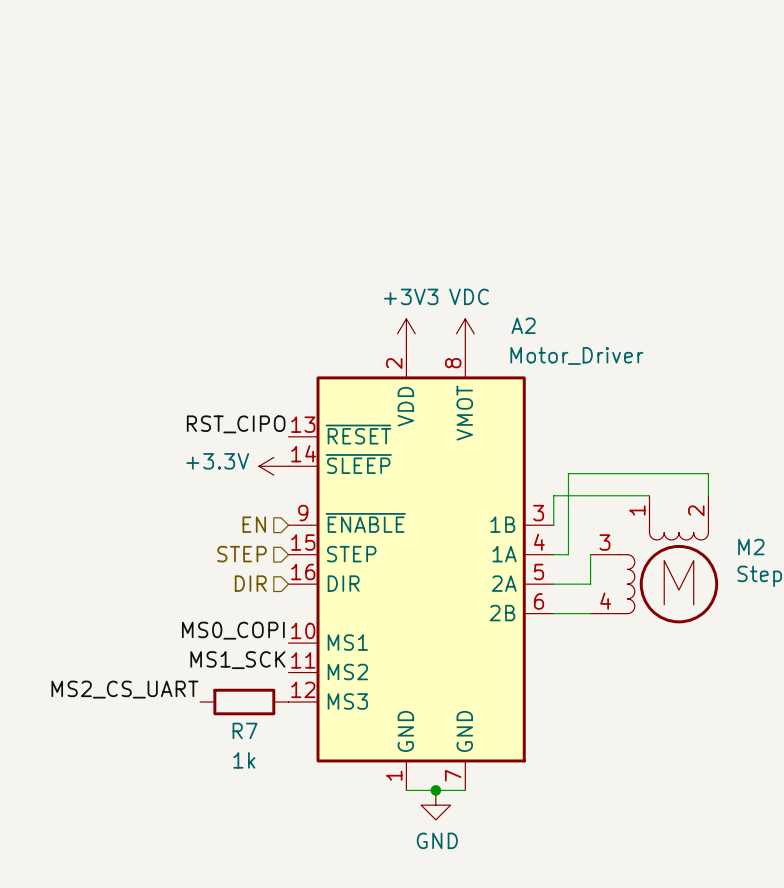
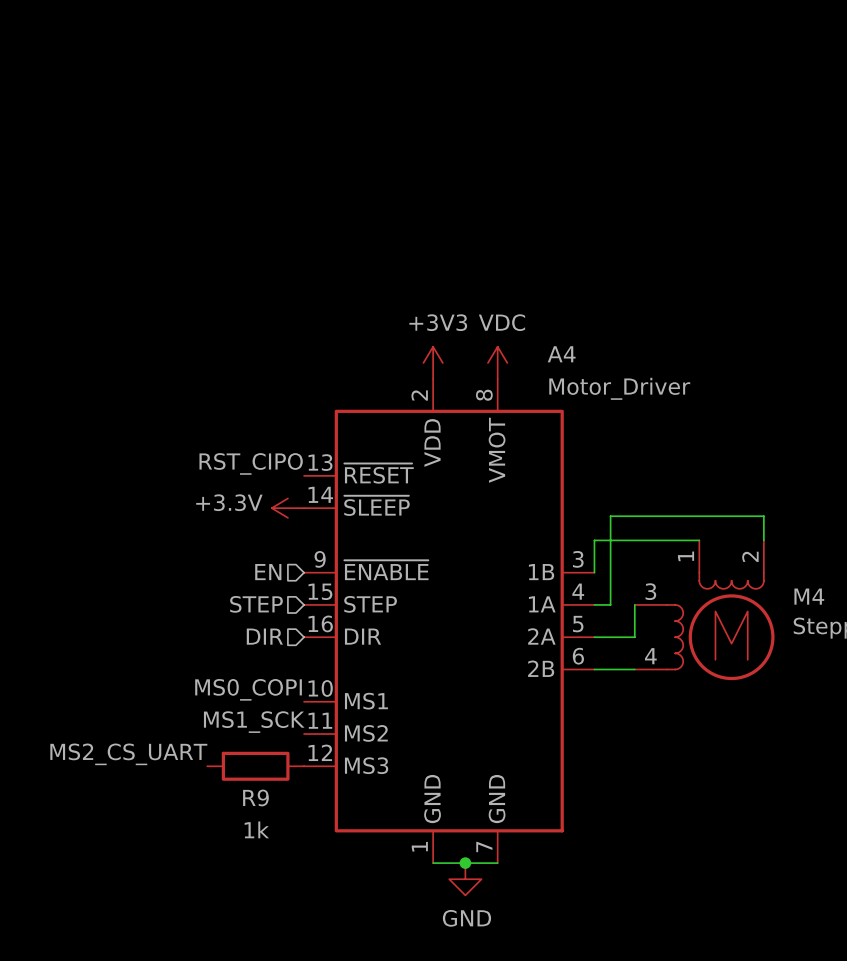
A2 name: A2 (523, 325) -> A4 (561, 354)
M2 name: M2 (751, 547) -> M4 (809, 596)
R7 name: R7 (245, 730) -> R9 (255, 797)

